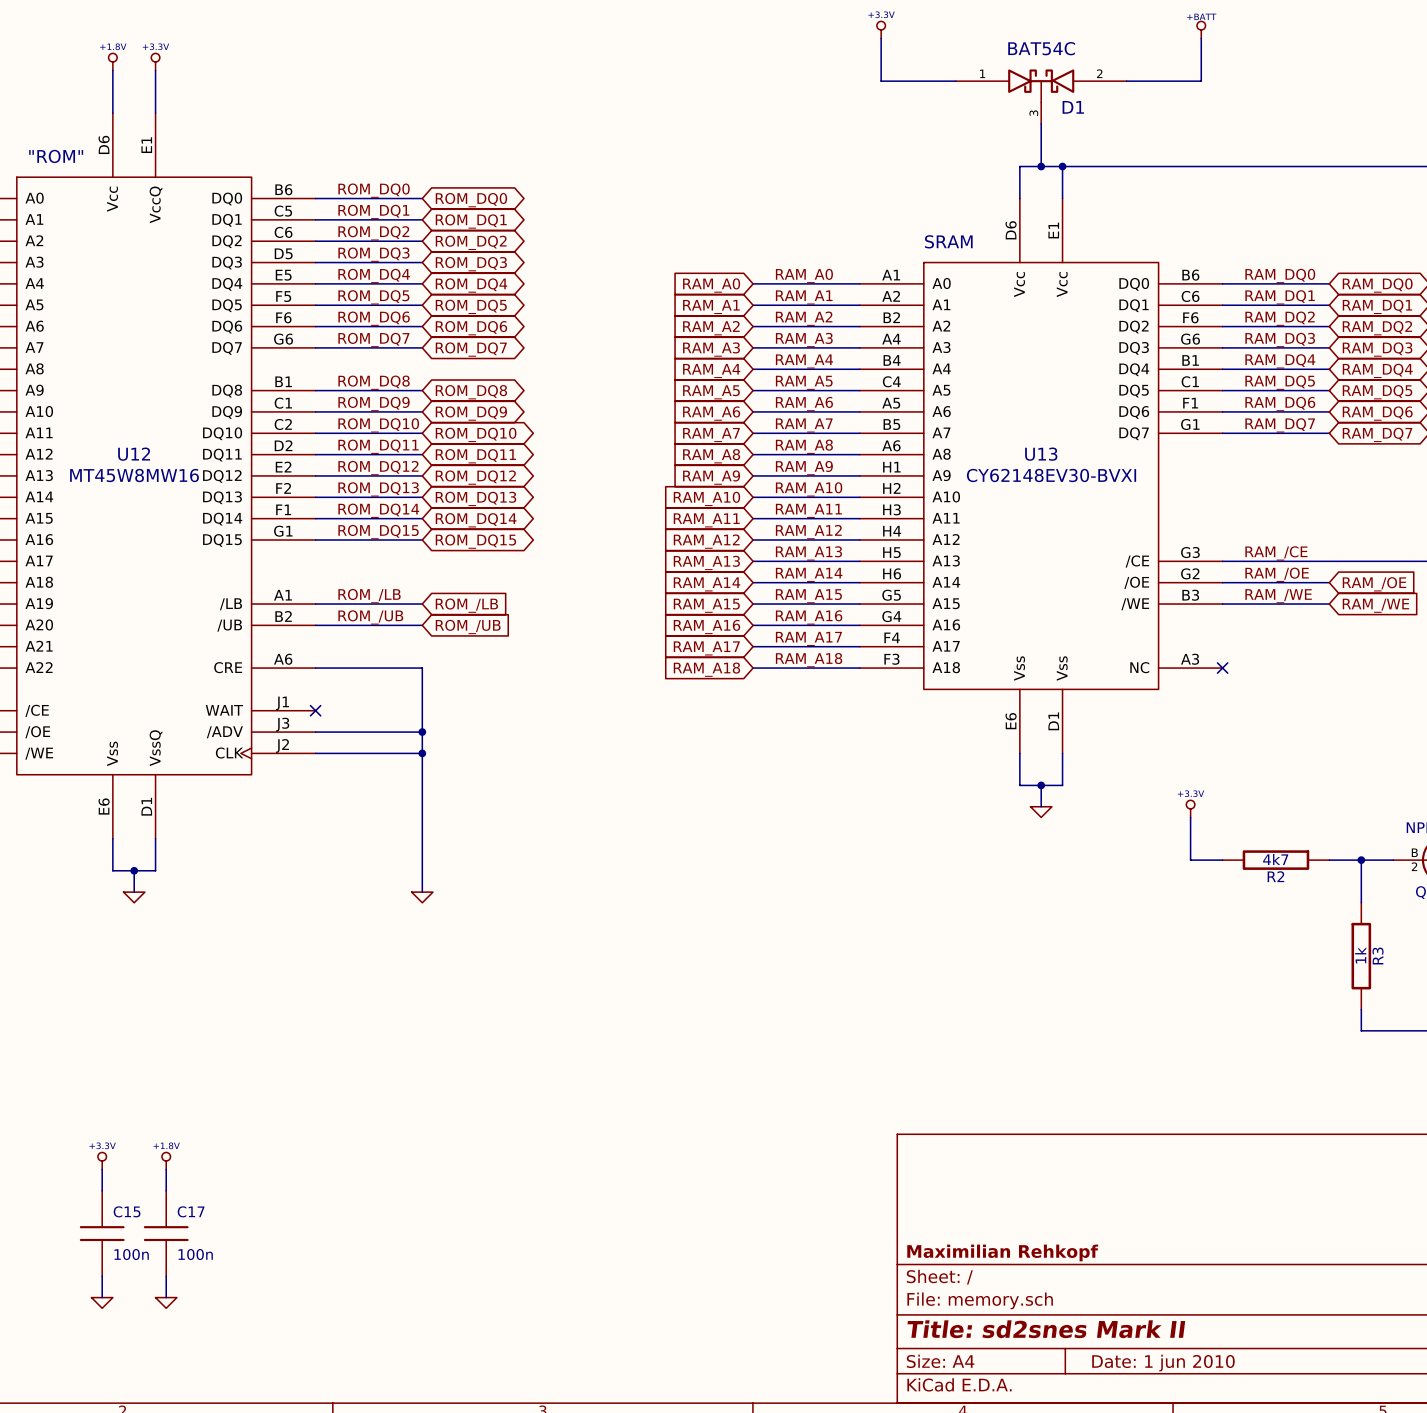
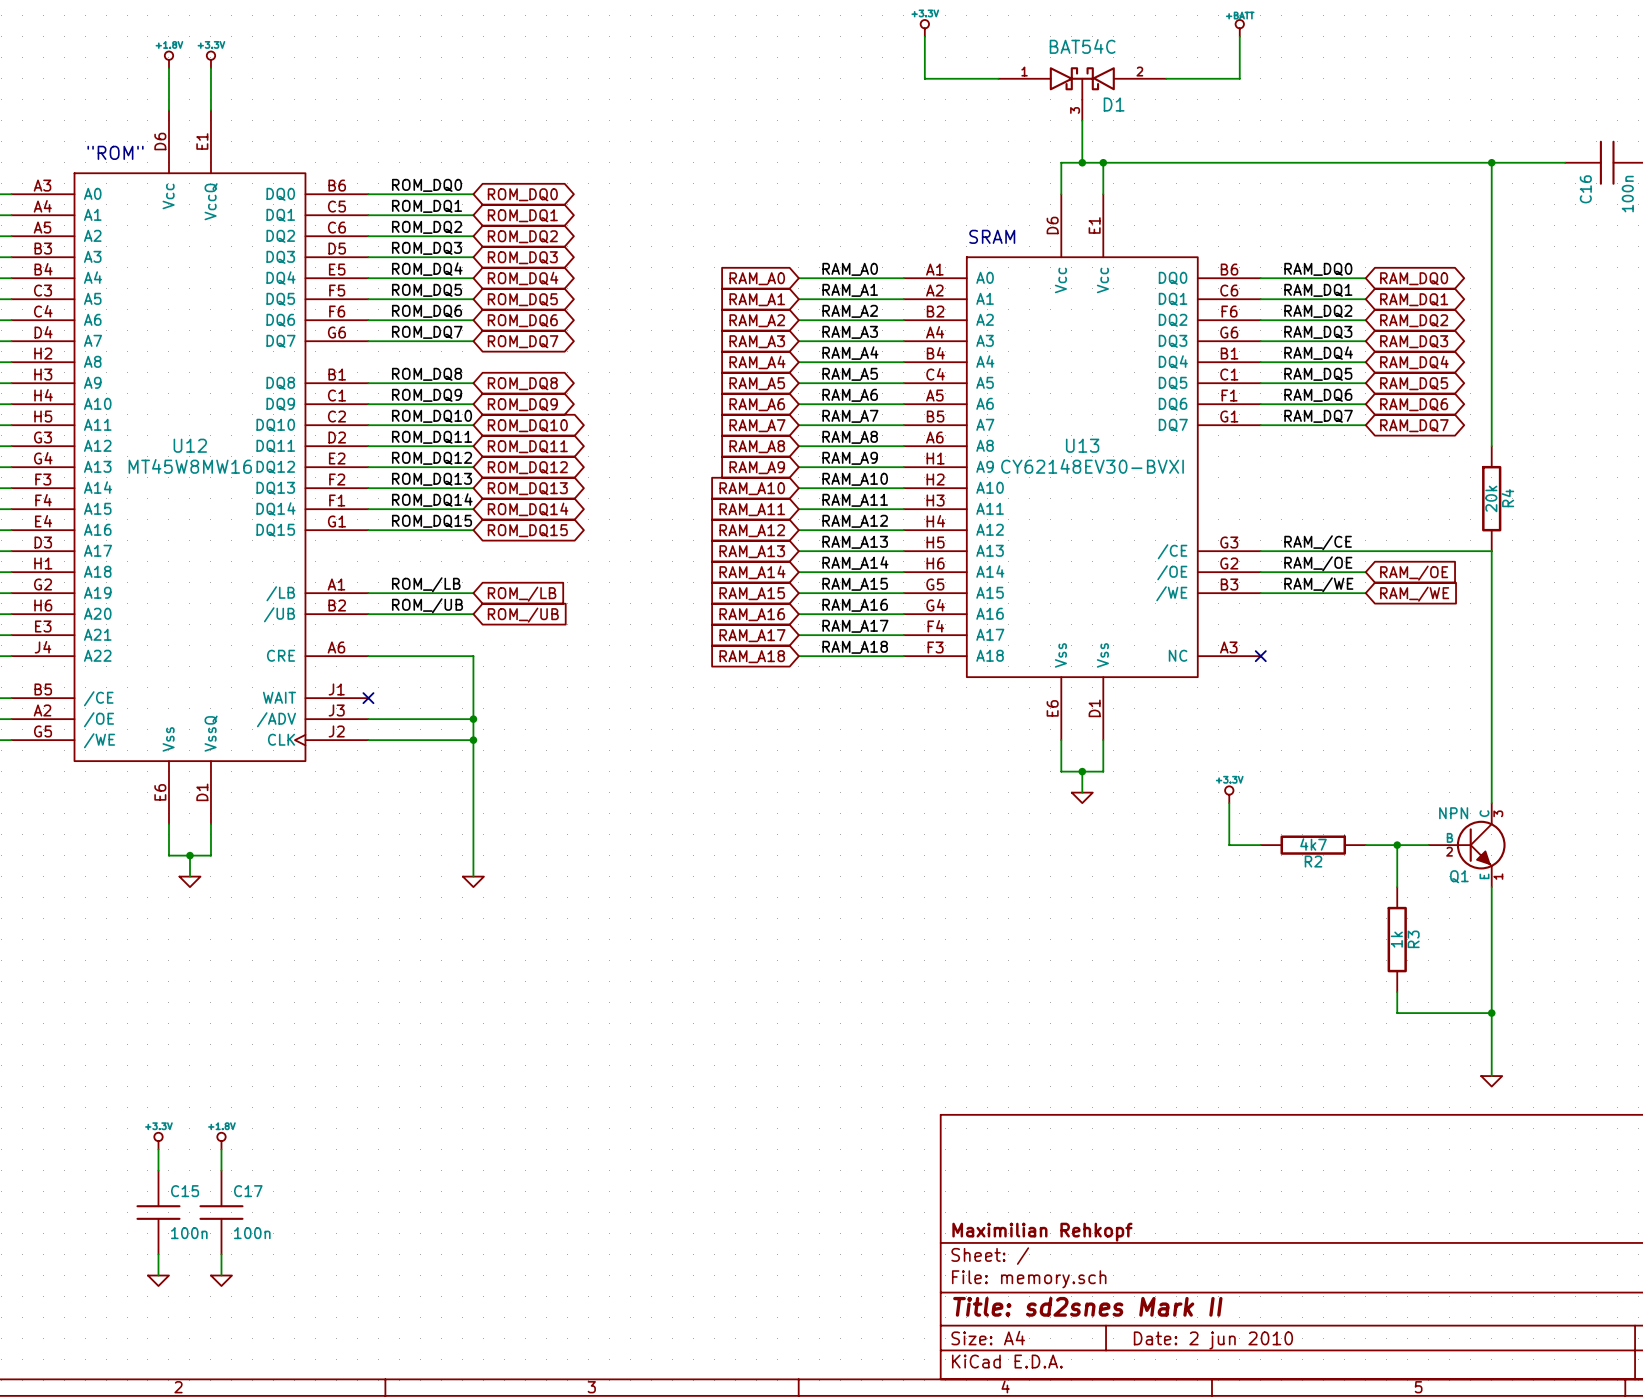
title block: Date: 1 jun 2010 (1163, 1363) -> Date: 2 jun 2010 (1213, 1340)

